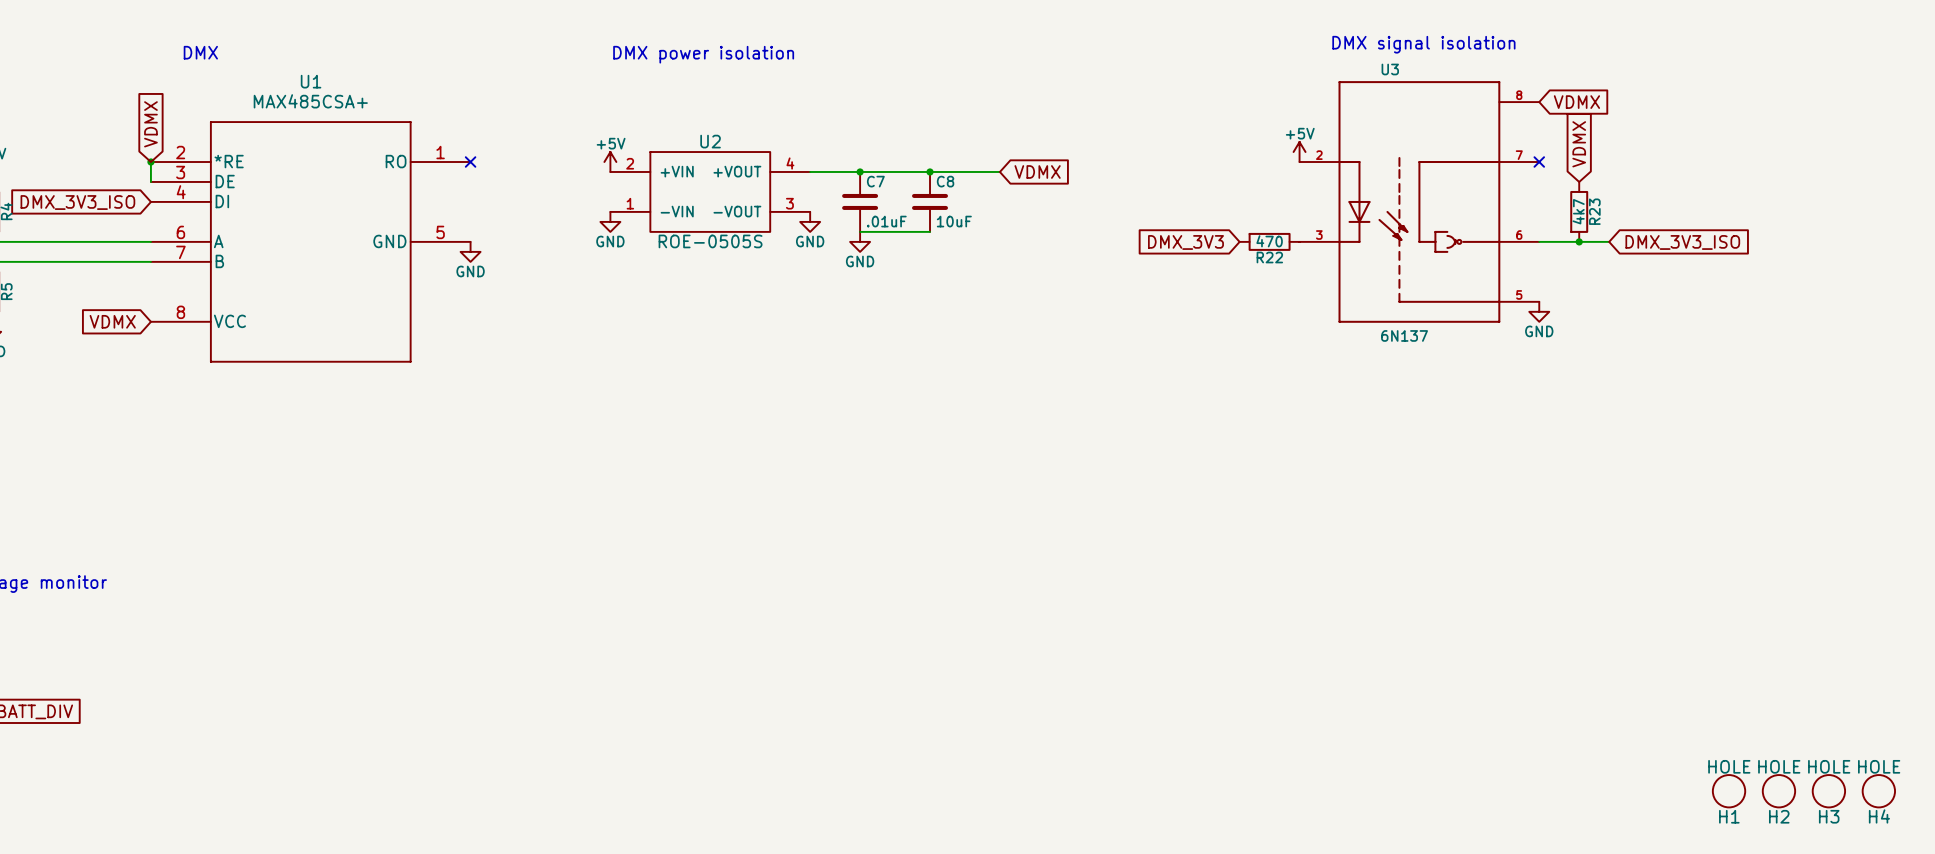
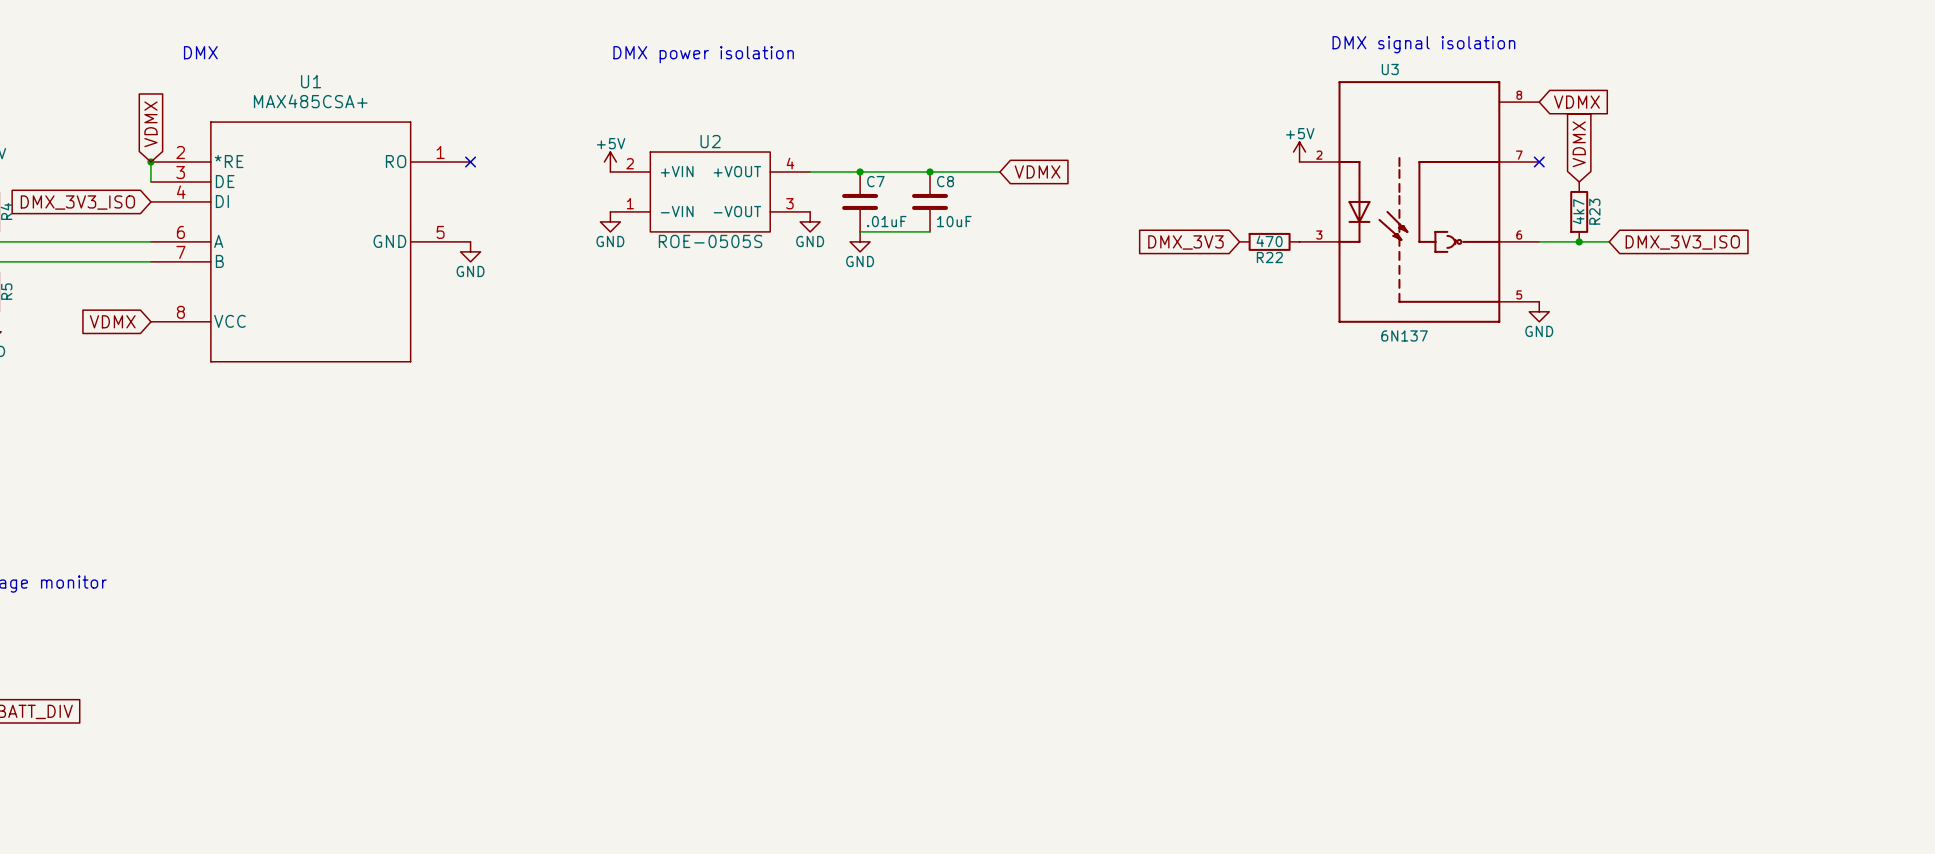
H1: HOLE (1729, 791) -> none
H2: HOLE (1778, 791) -> none
H3: HOLE (1828, 791) -> none
H4: HOLE (1878, 791) -> none

